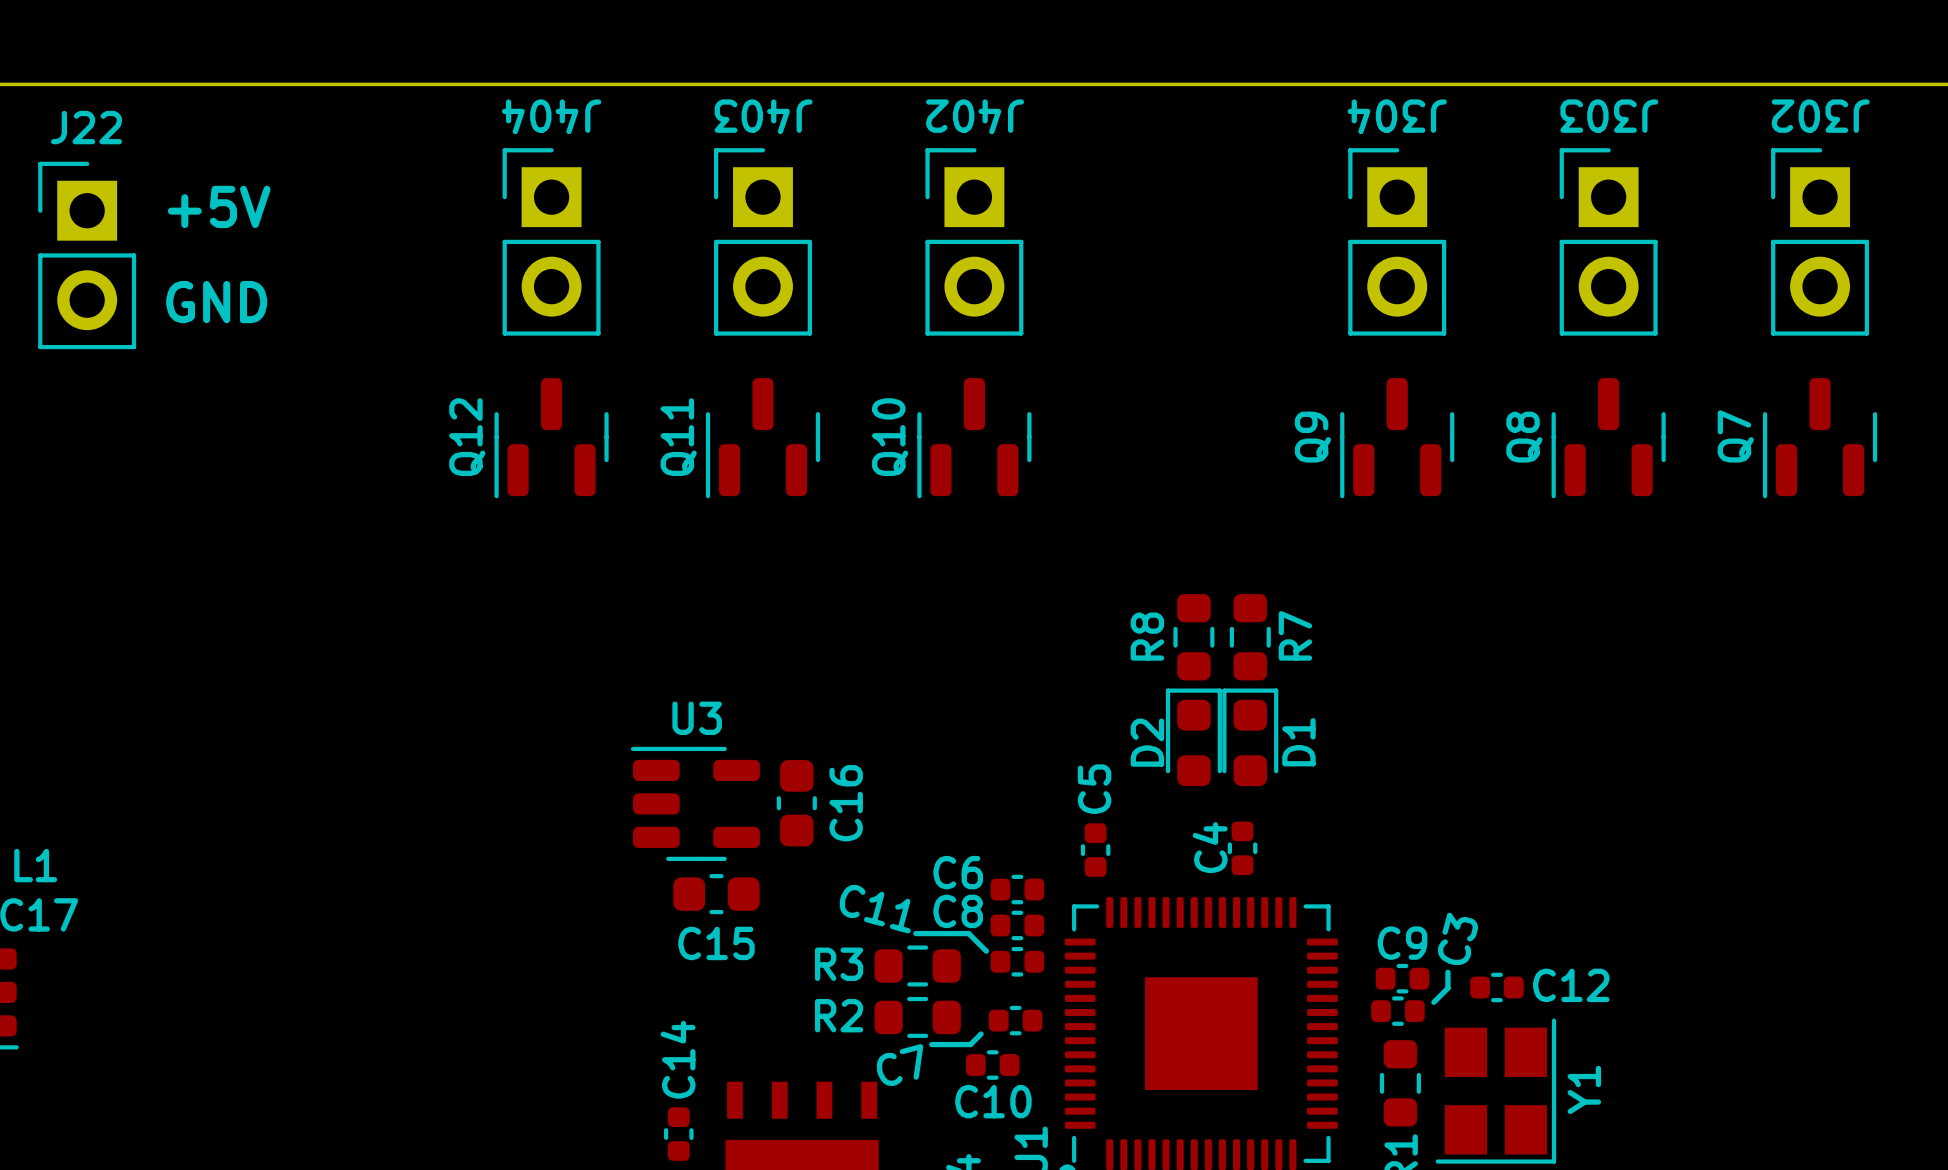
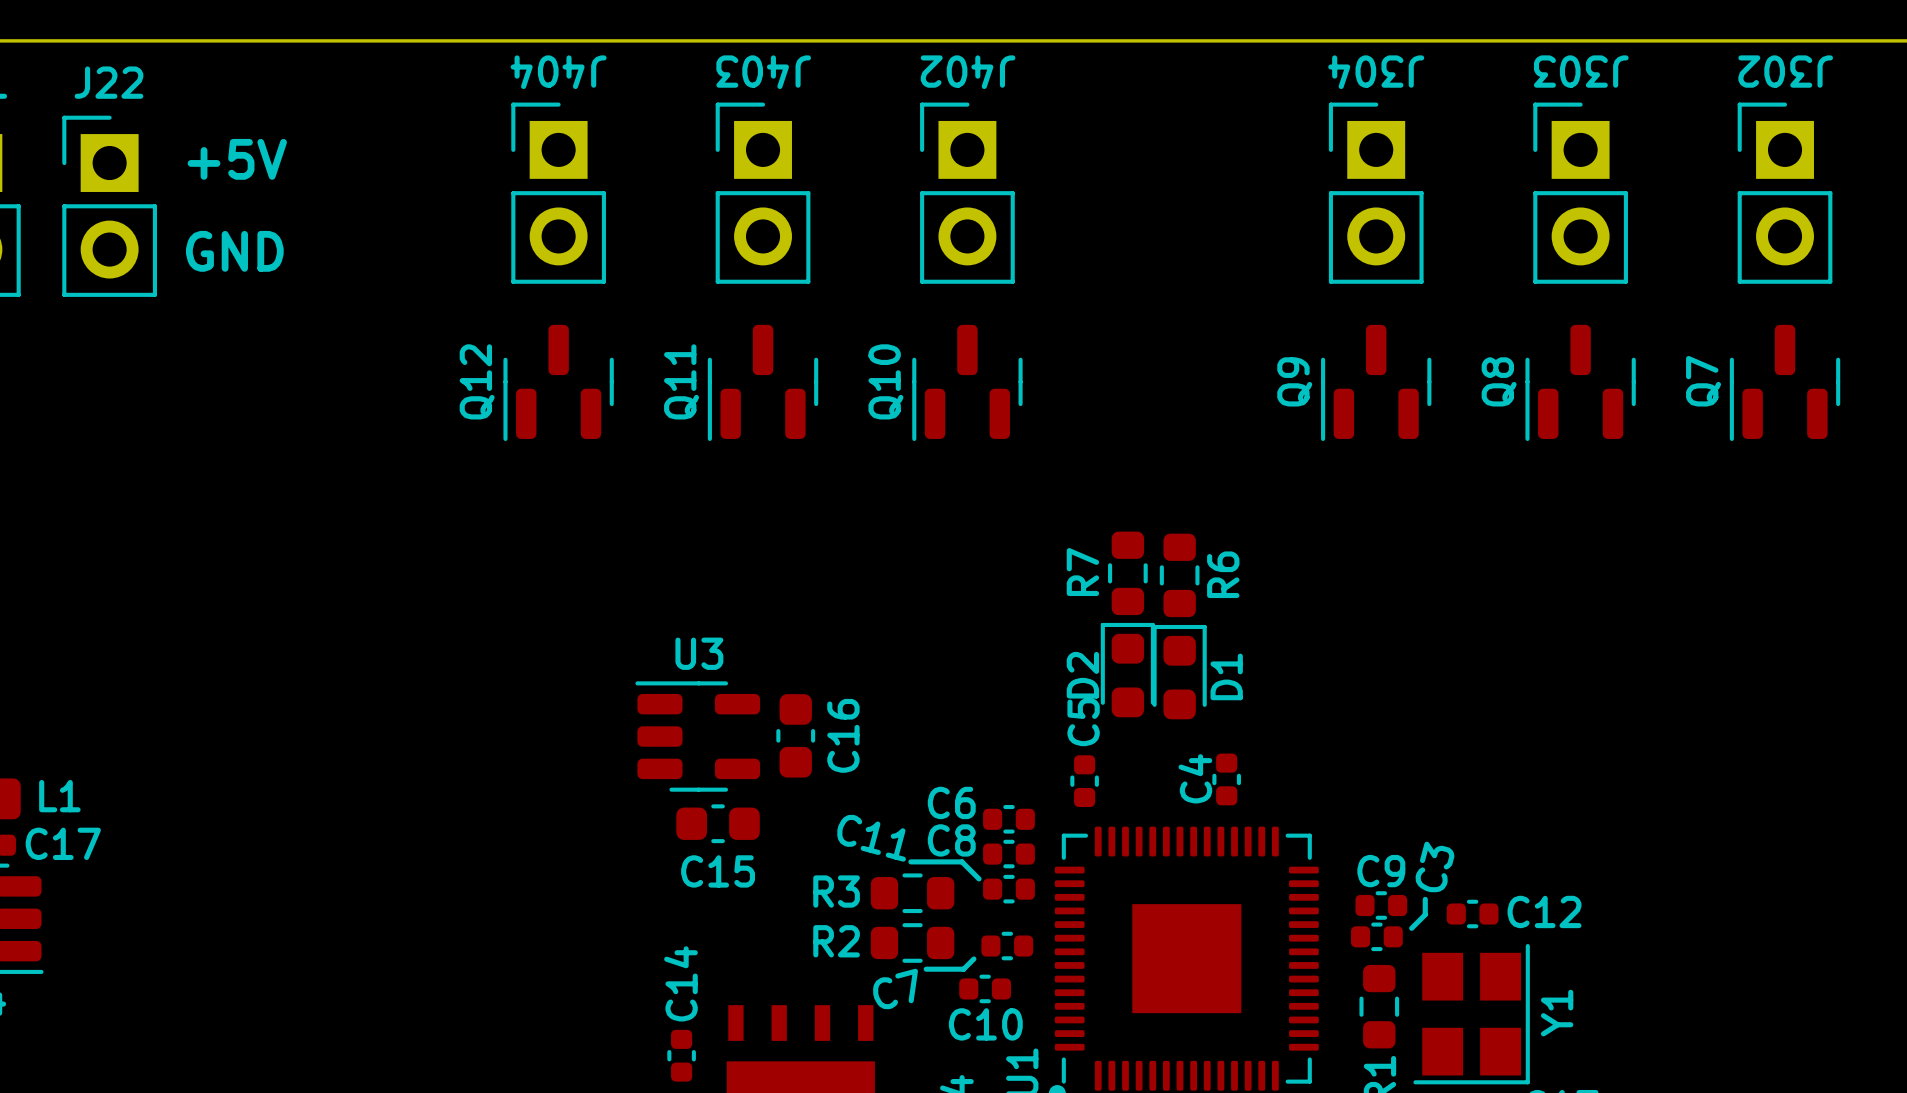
R7 name position: R7 (1295, 635) -> R7 (1082, 572)
R8 name: R8 (1147, 636) -> R6 (1223, 574)
R7 position: (1250, 637) -> (1127, 573)
D2: none -> (1127, 670)
D1: (1250, 737) -> none
D2 name: D2 (1147, 742) -> D1 (1226, 676)

